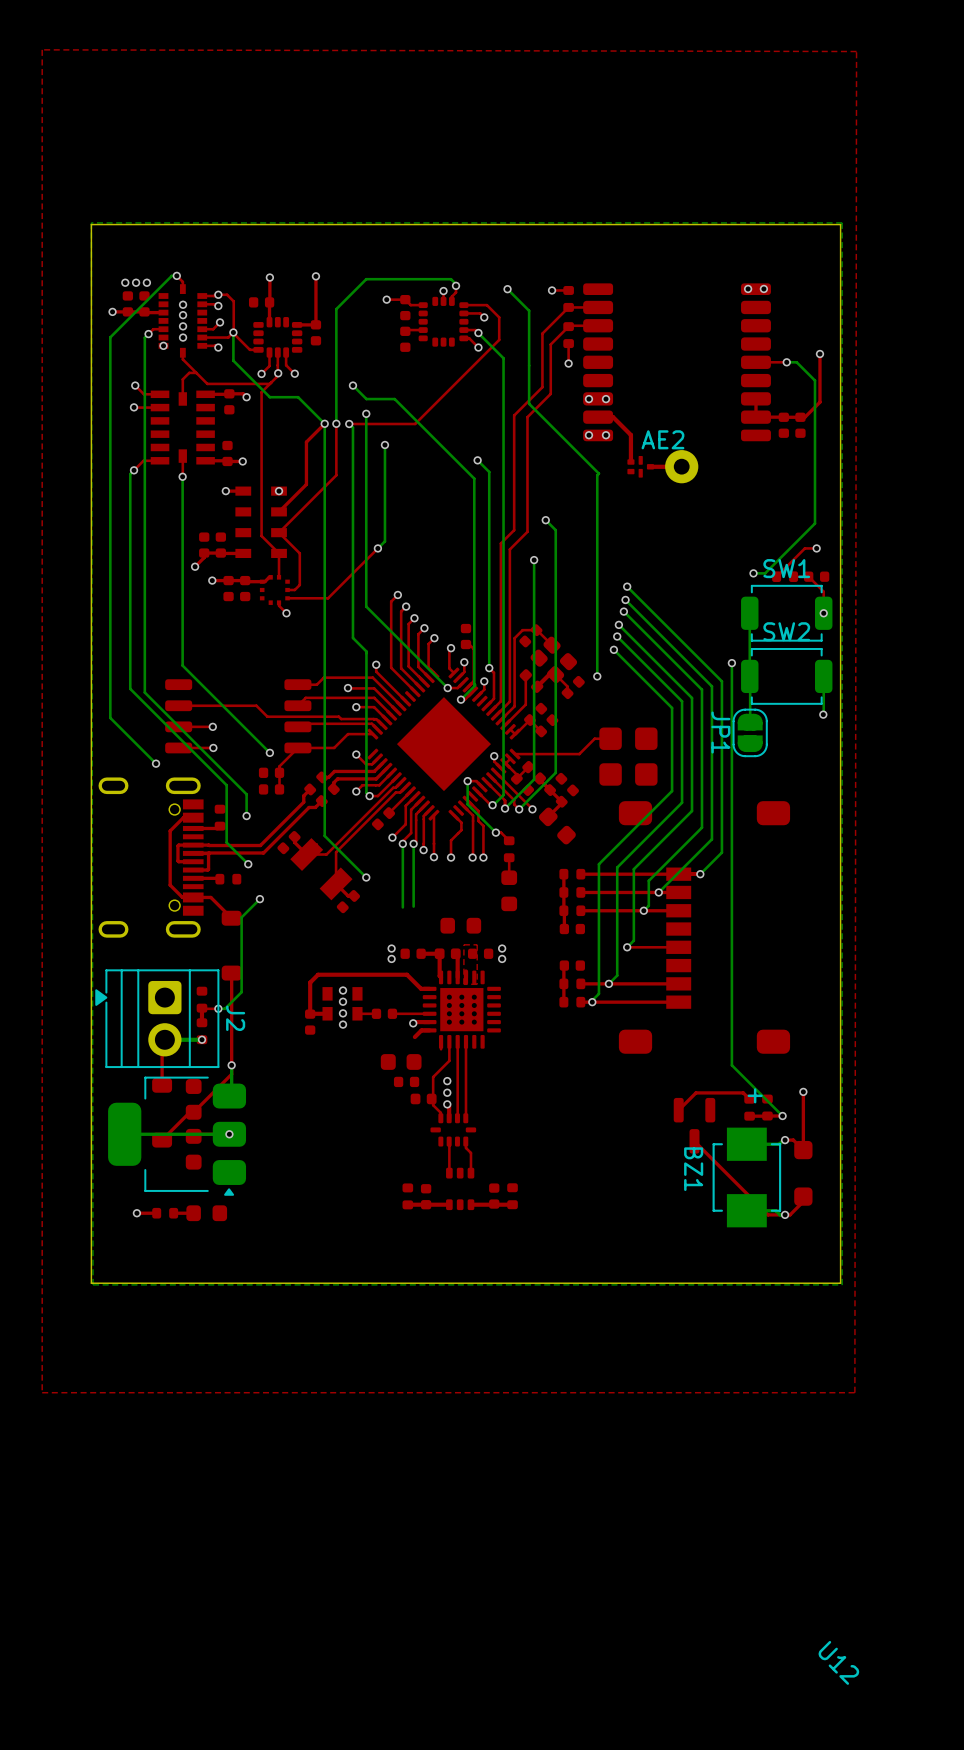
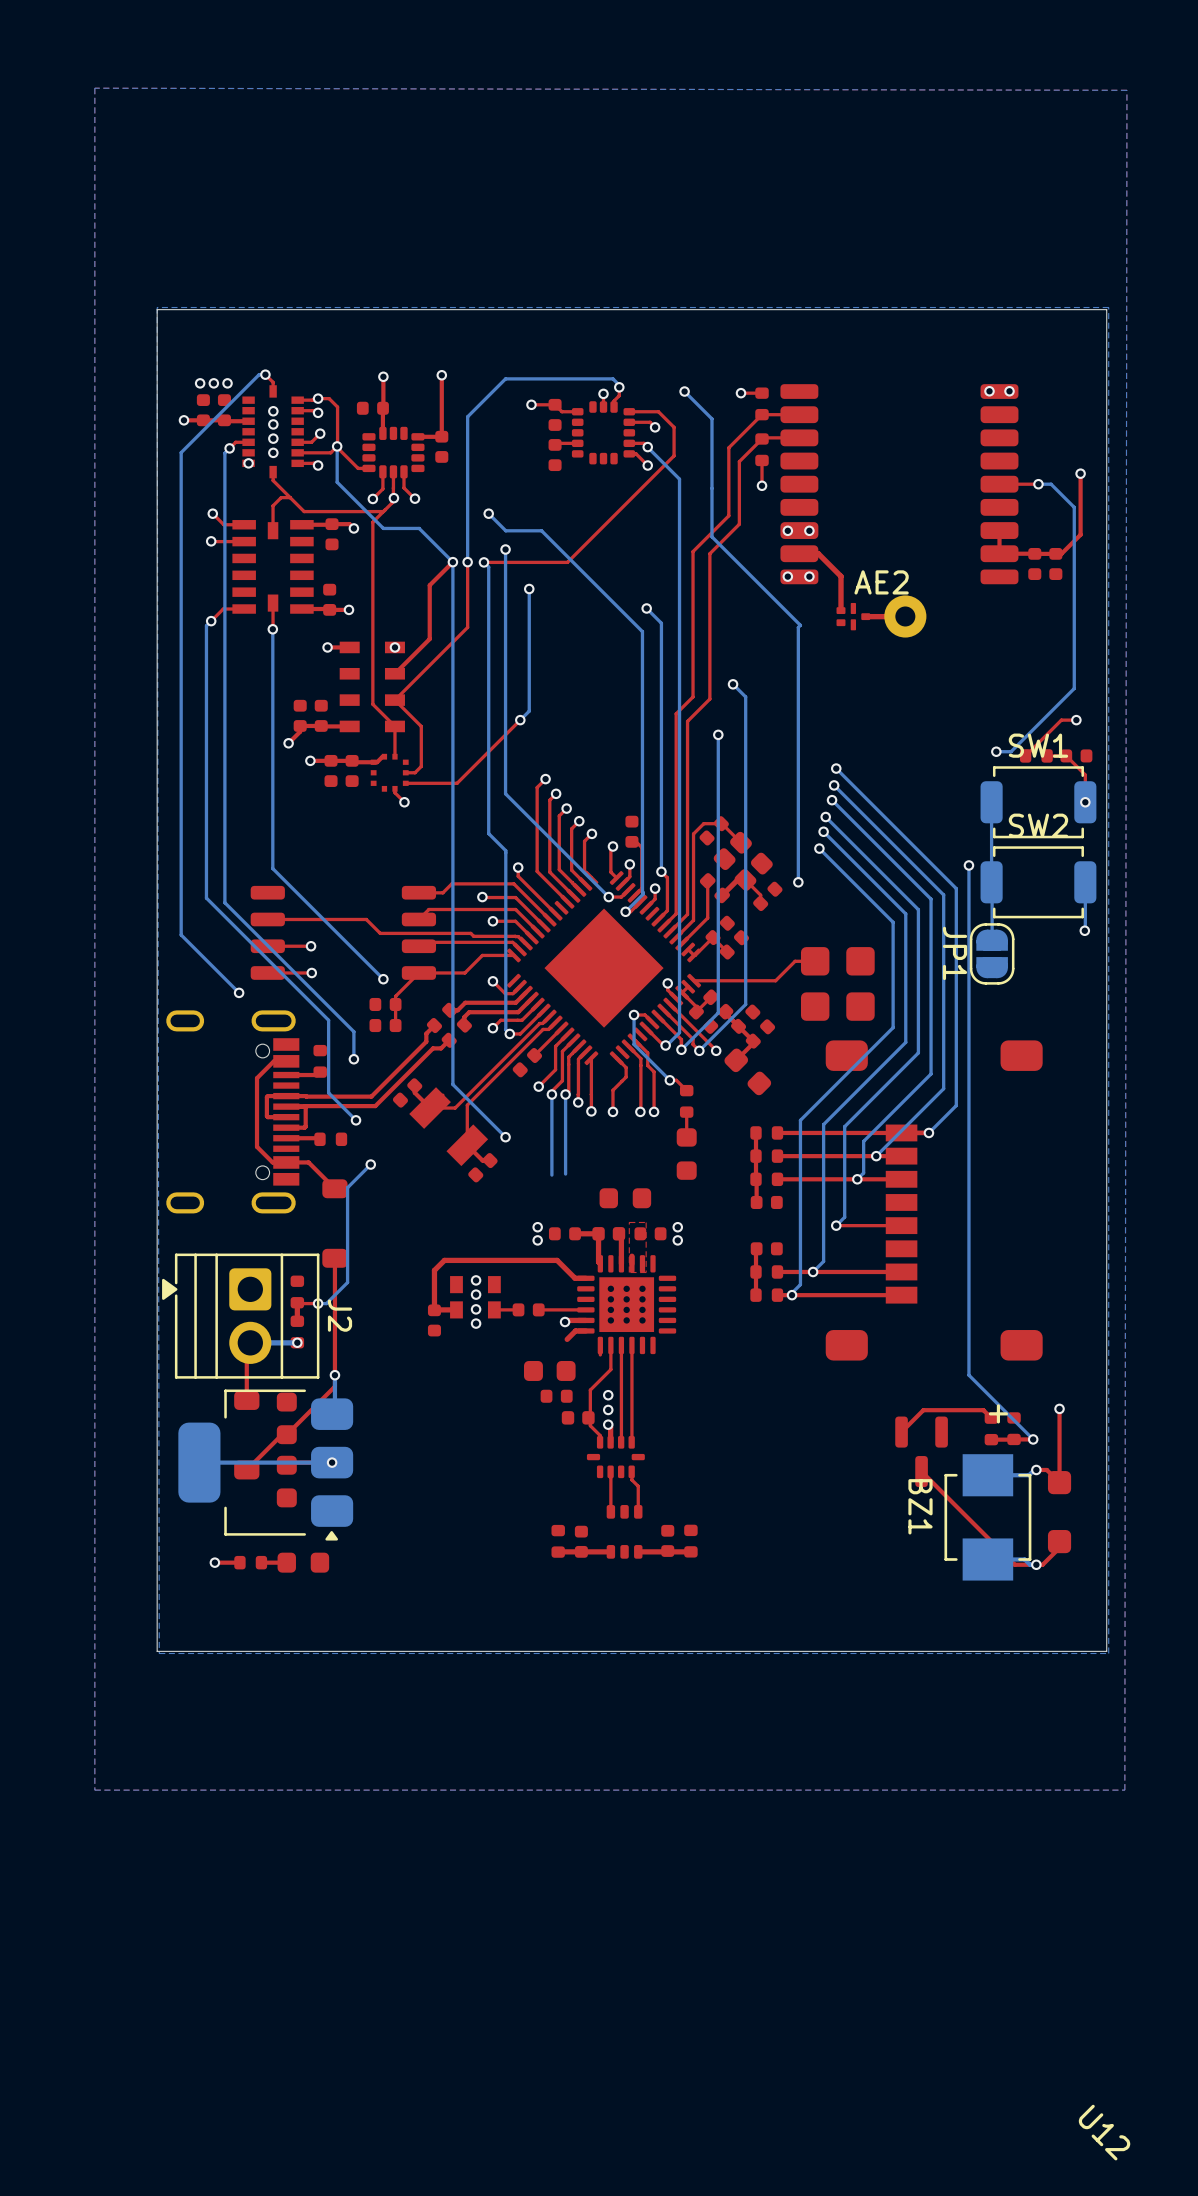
bottom zone outline: none -> (94, 88) (1126, 90) (1124, 1790) (94, 1790) (94, 88)

